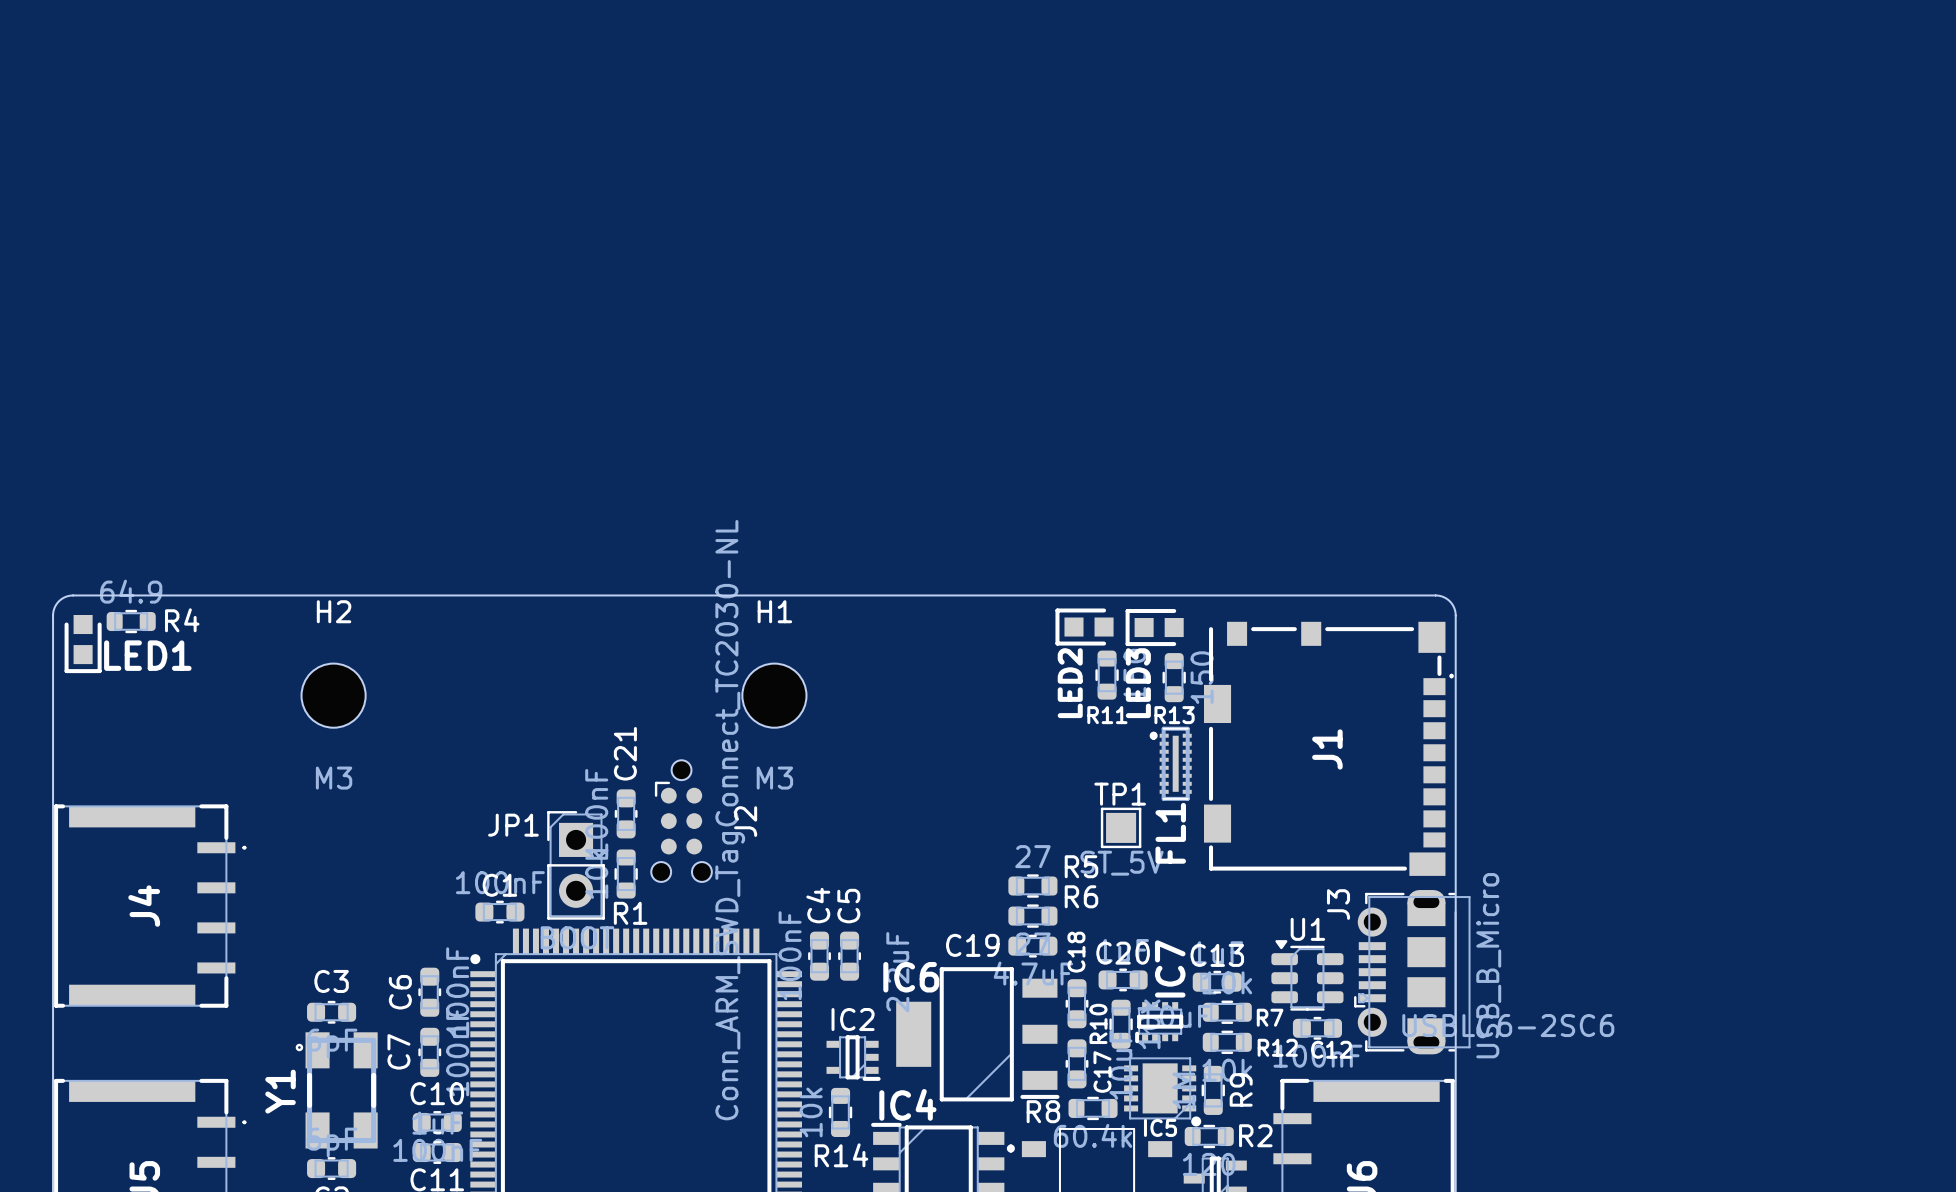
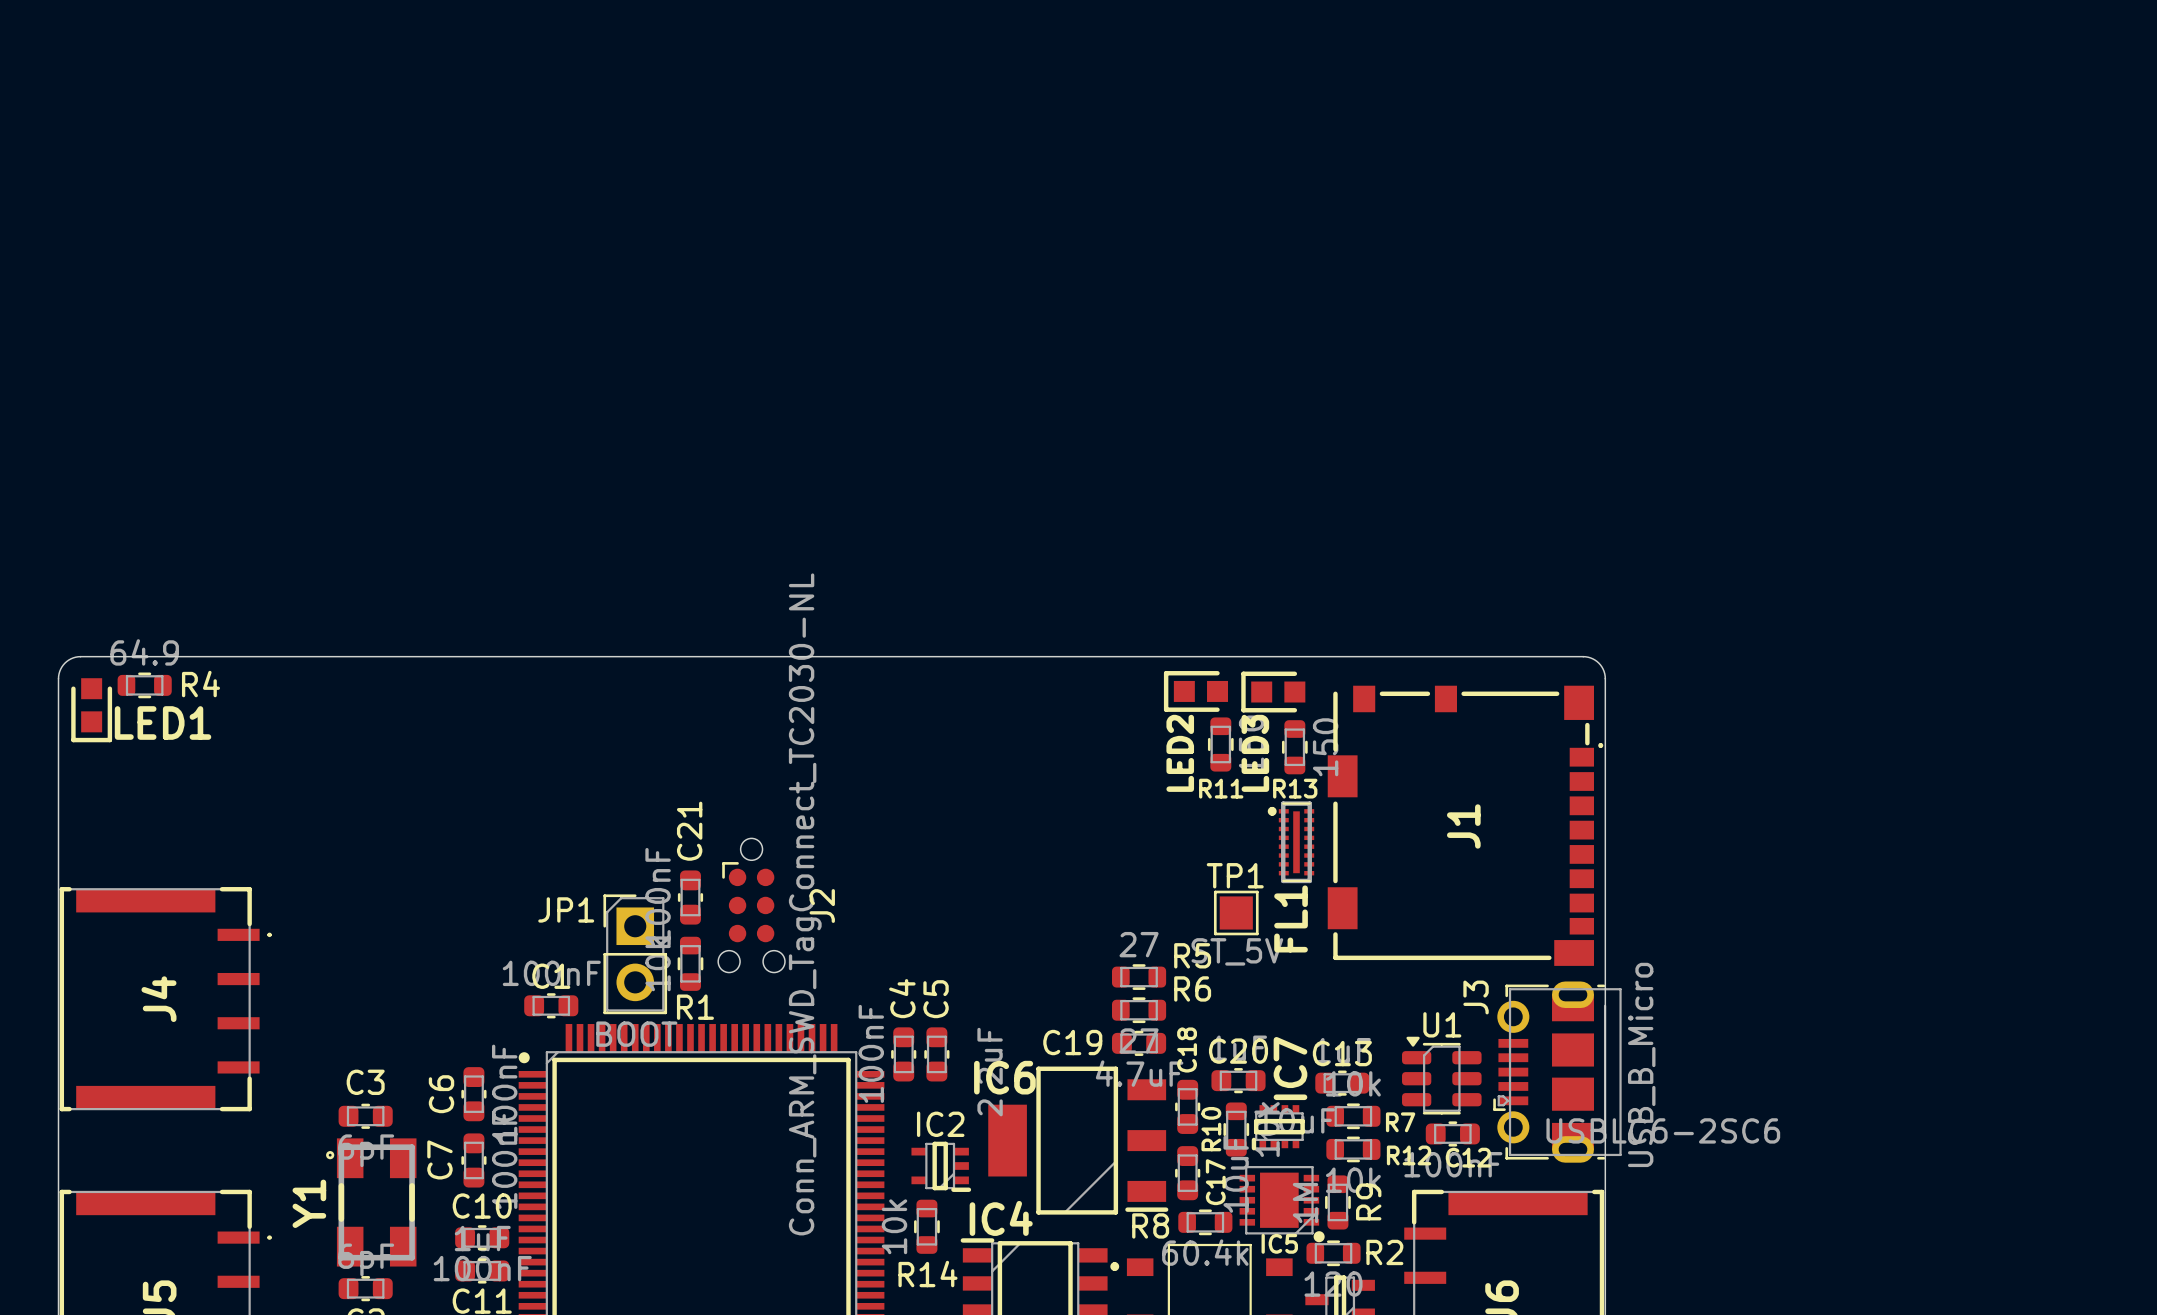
H2: M3 (333, 695) -> none
H1: M3 (774, 695) -> none

